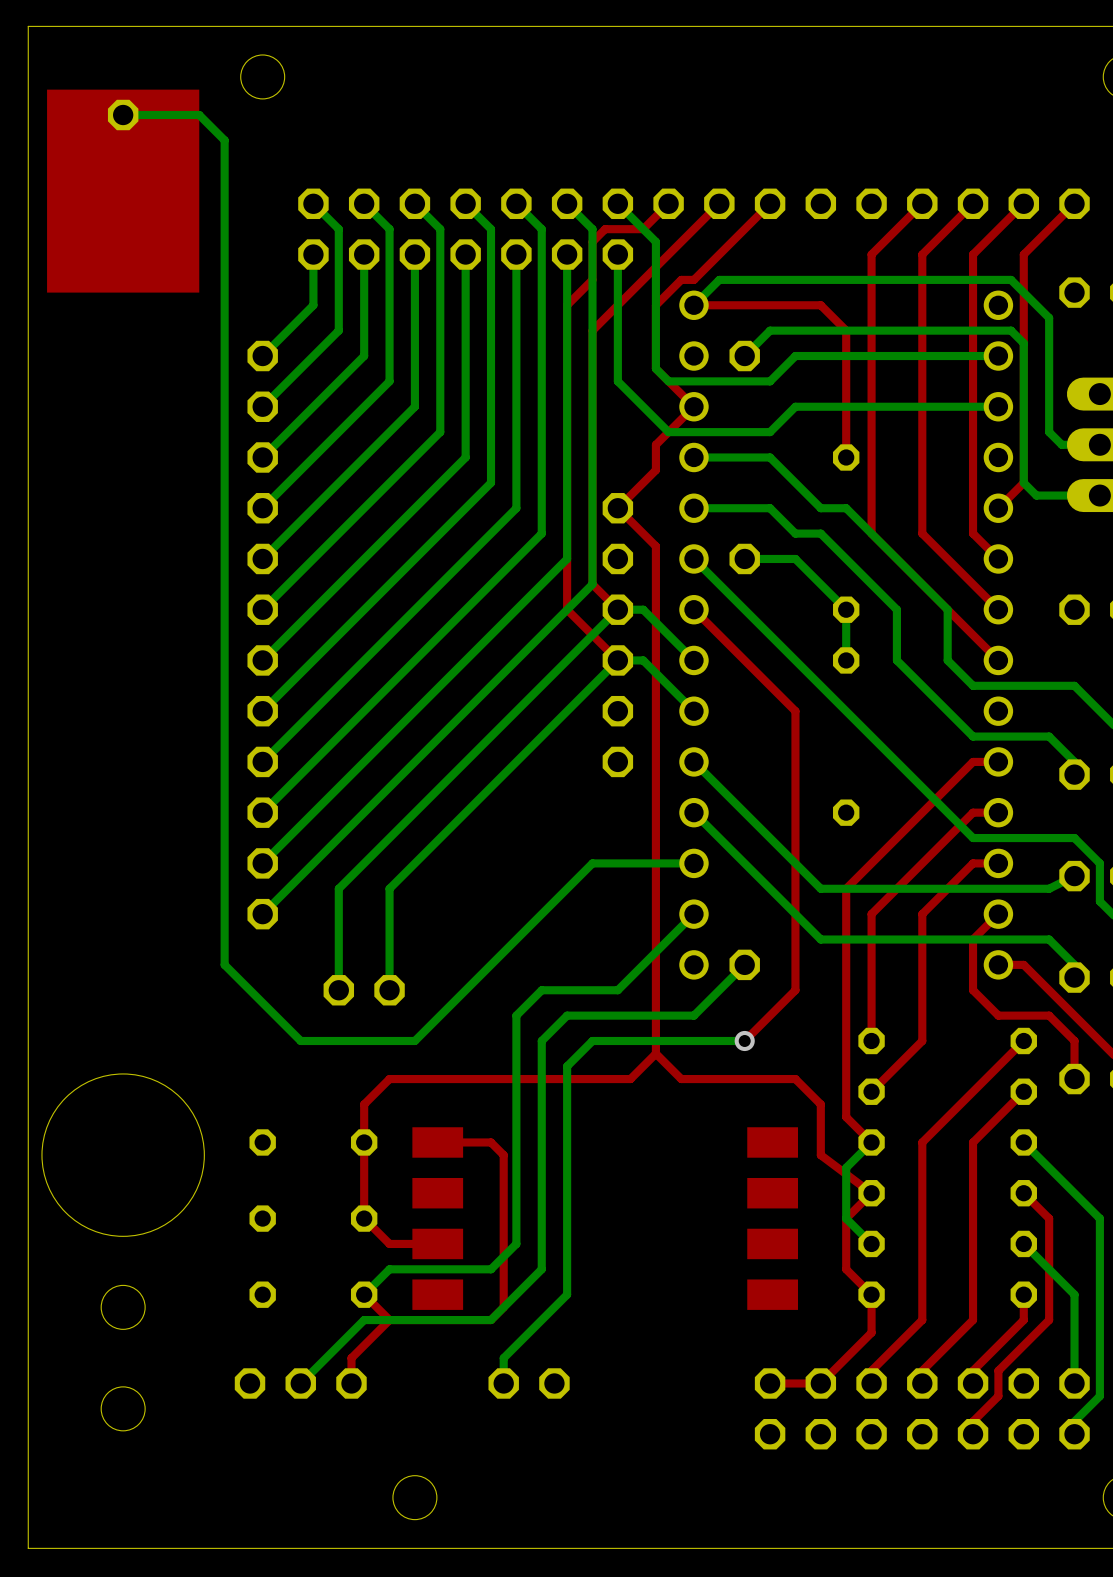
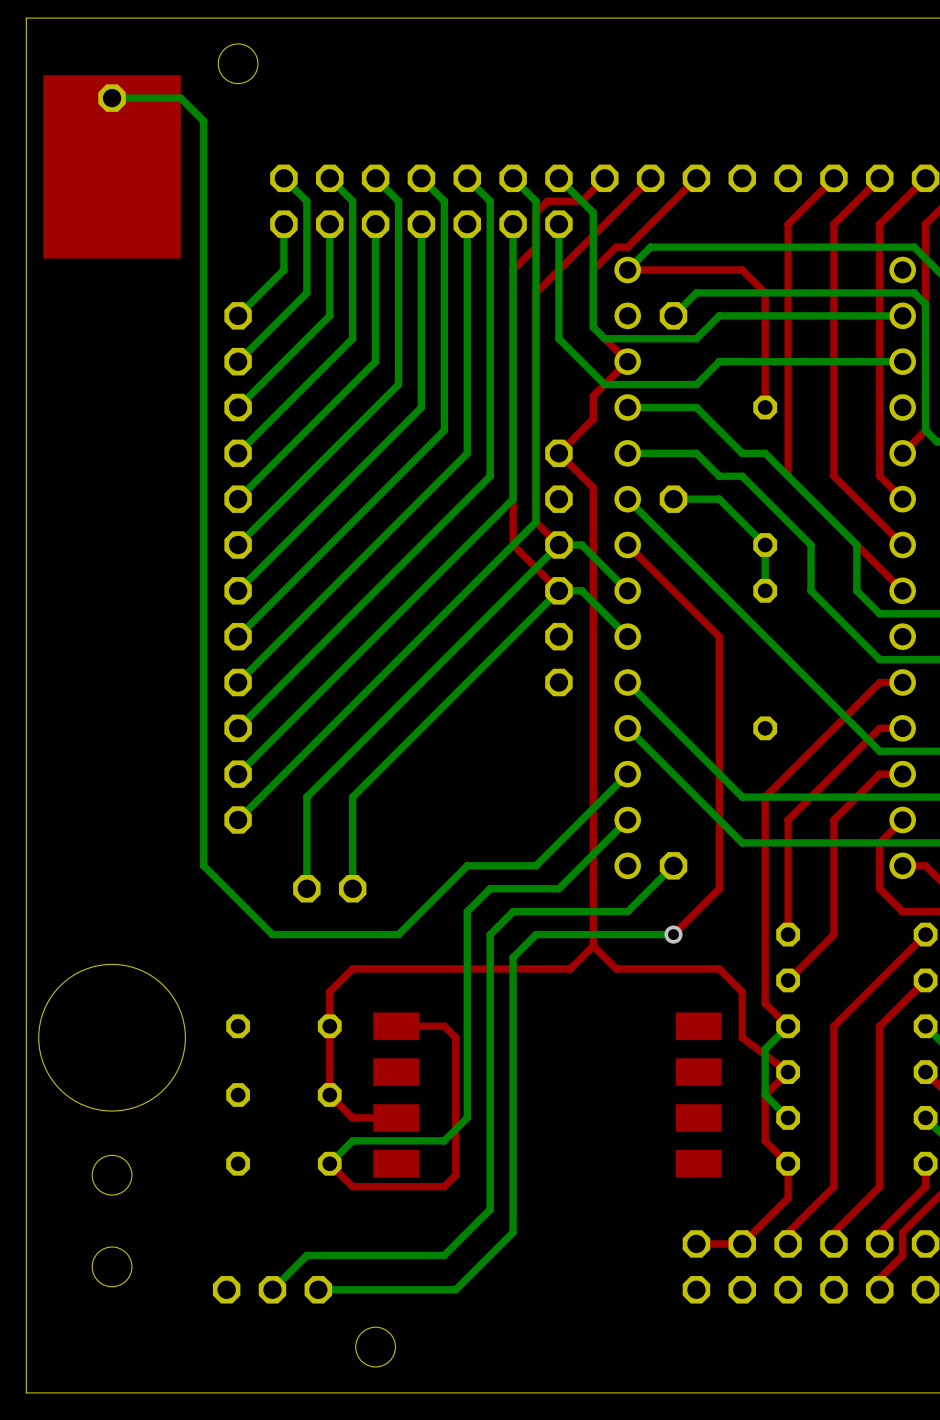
bottom track: (693, 863) (592, 863) (414, 1040) -> (627, 774) (536, 865) (467, 865) (398, 934) (375, 934)
bottom track: (541, 1269) (491, 1320) (364, 1320) (300, 1383) -> (490, 1140) (490, 1209) (444, 1255) (306, 1255) (272, 1289)
bottom track: (567, 1294) (503, 1358) (503, 1383) -> (513, 1163) (513, 1232) (455, 1289) (318, 1289)
top track: (389, 1320) (351, 1358) (351, 1383) -> none
part: (250, 1383) -> none
part: (300, 1383) -> none
part: (351, 1383) -> none
part: (503, 1383) -> none
part: (554, 1383) -> none
part: none -> (226, 1289)
part: none -> (272, 1289)
part: none -> (318, 1289)

